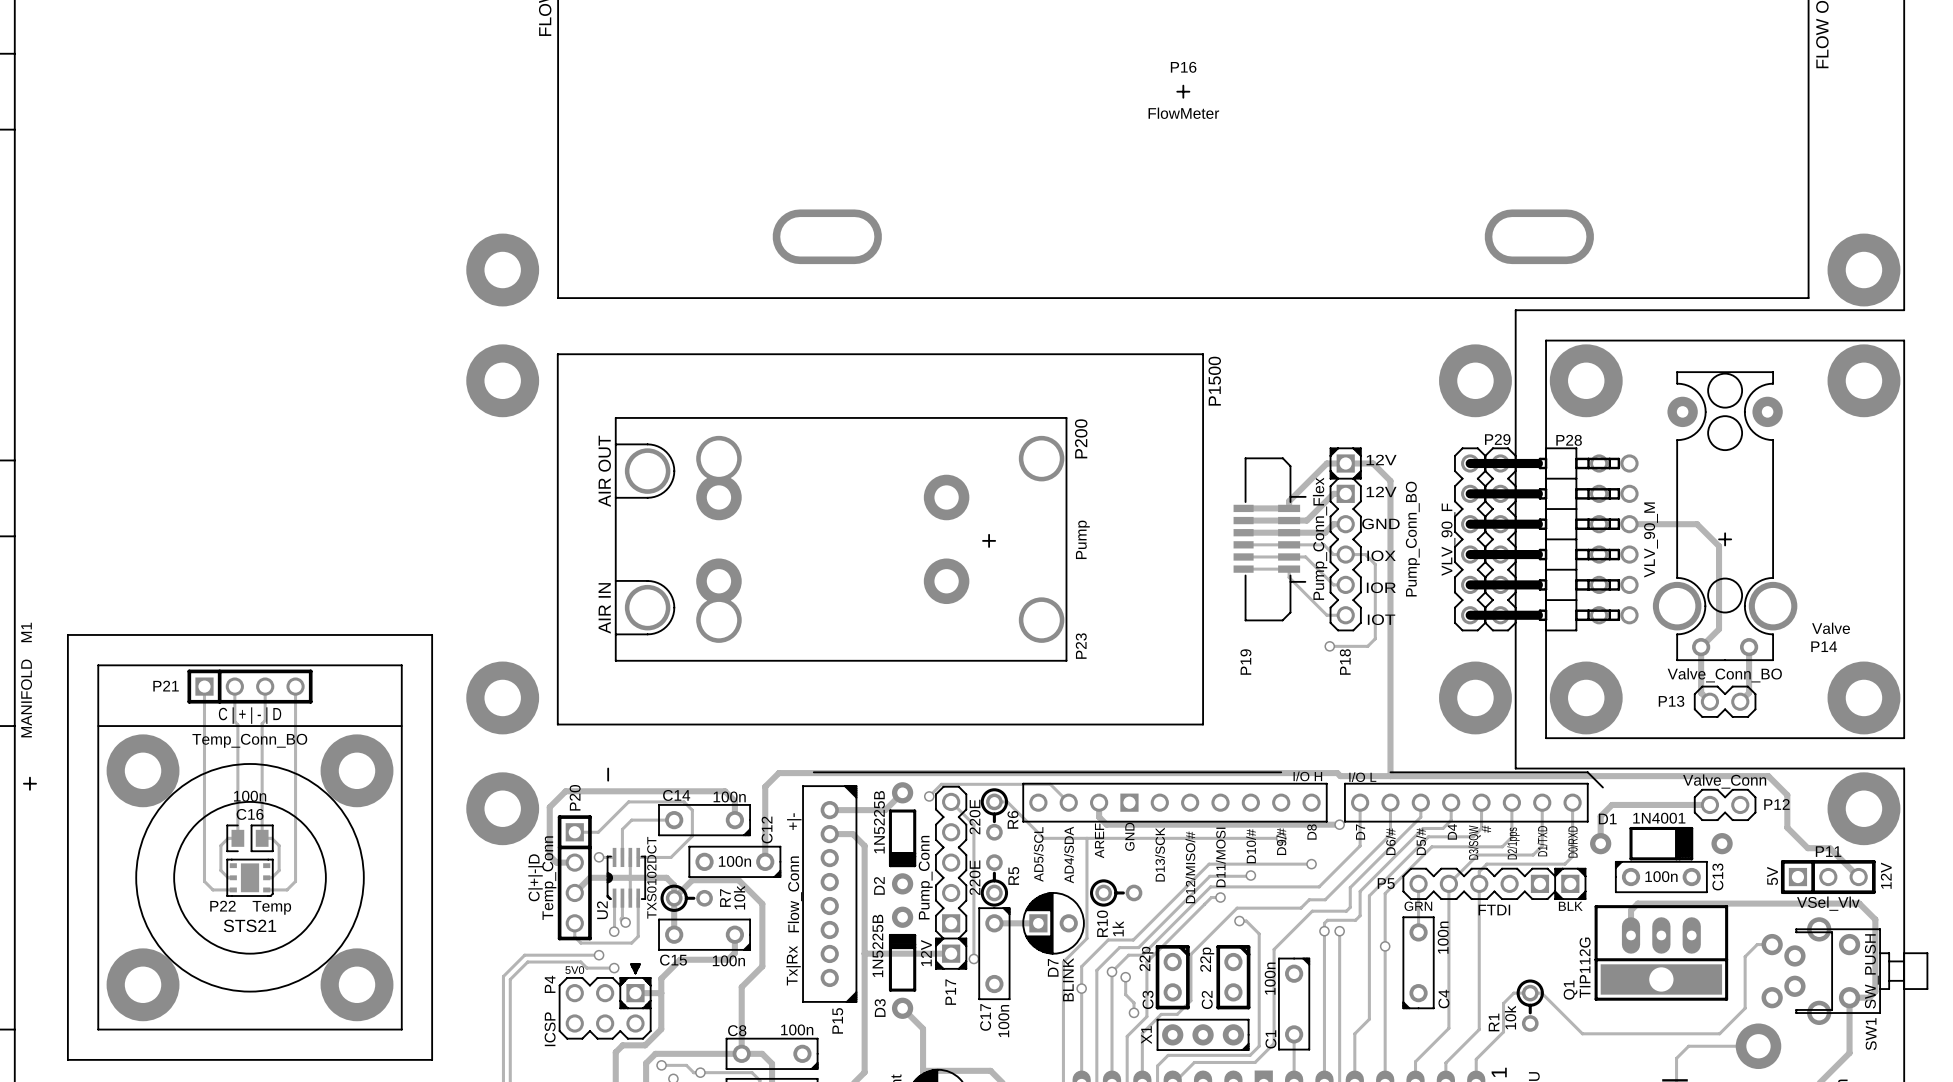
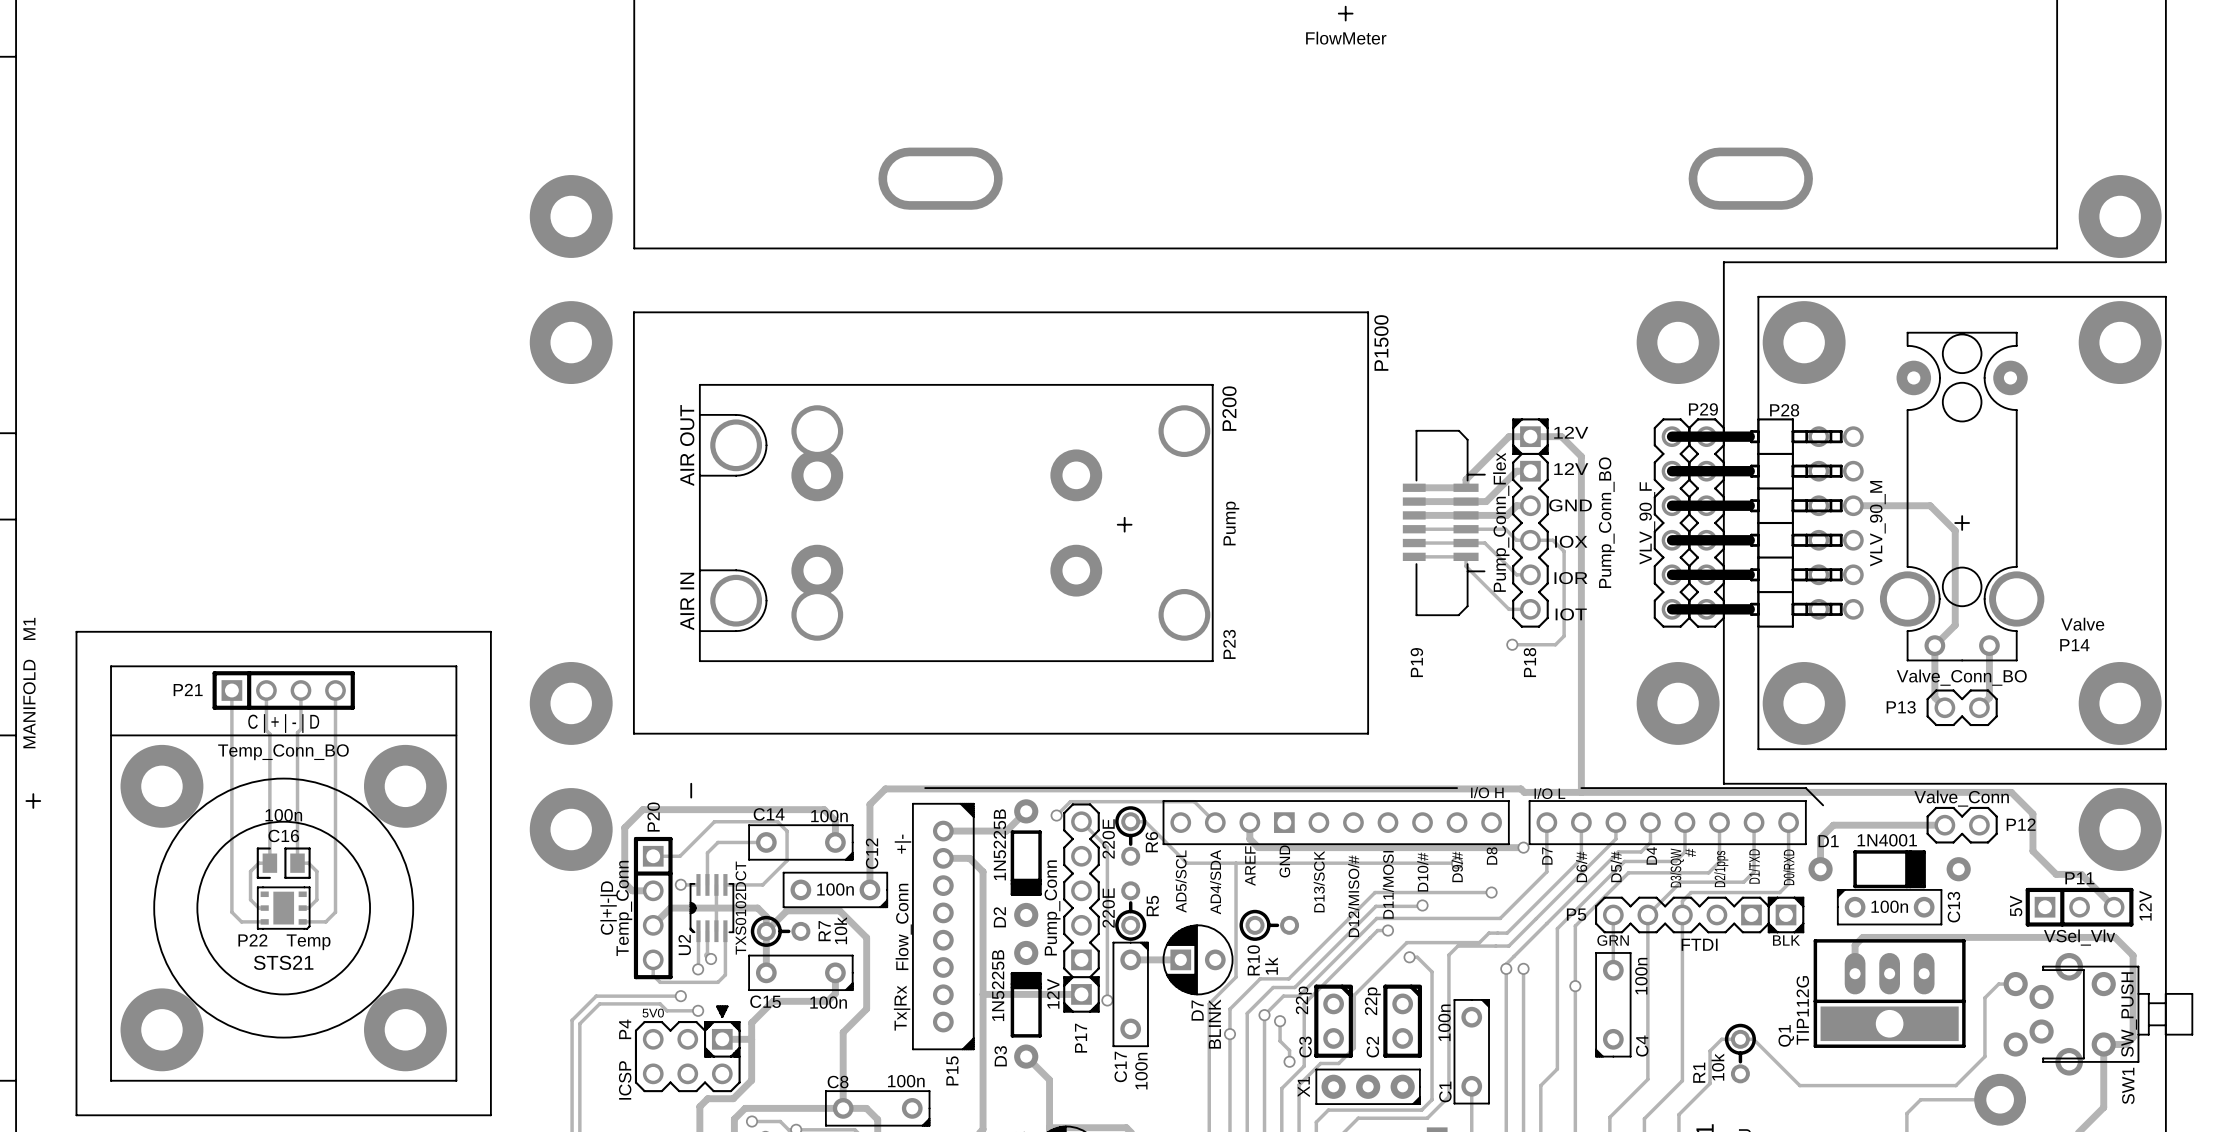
track: (1350, 887) (1350, 907) (1346, 911) (1326, 911) -> (1535, 919) (1508, 946)
track: (1360, 891) (1360, 915) (1355, 920) (1327, 920) (1324, 923) (1324, 927) -> (1546, 923) (1506, 964)
track: (1312, 911) (1274, 949) -> (1492, 946) (1457, 946) (1448, 955) (1448, 989)

